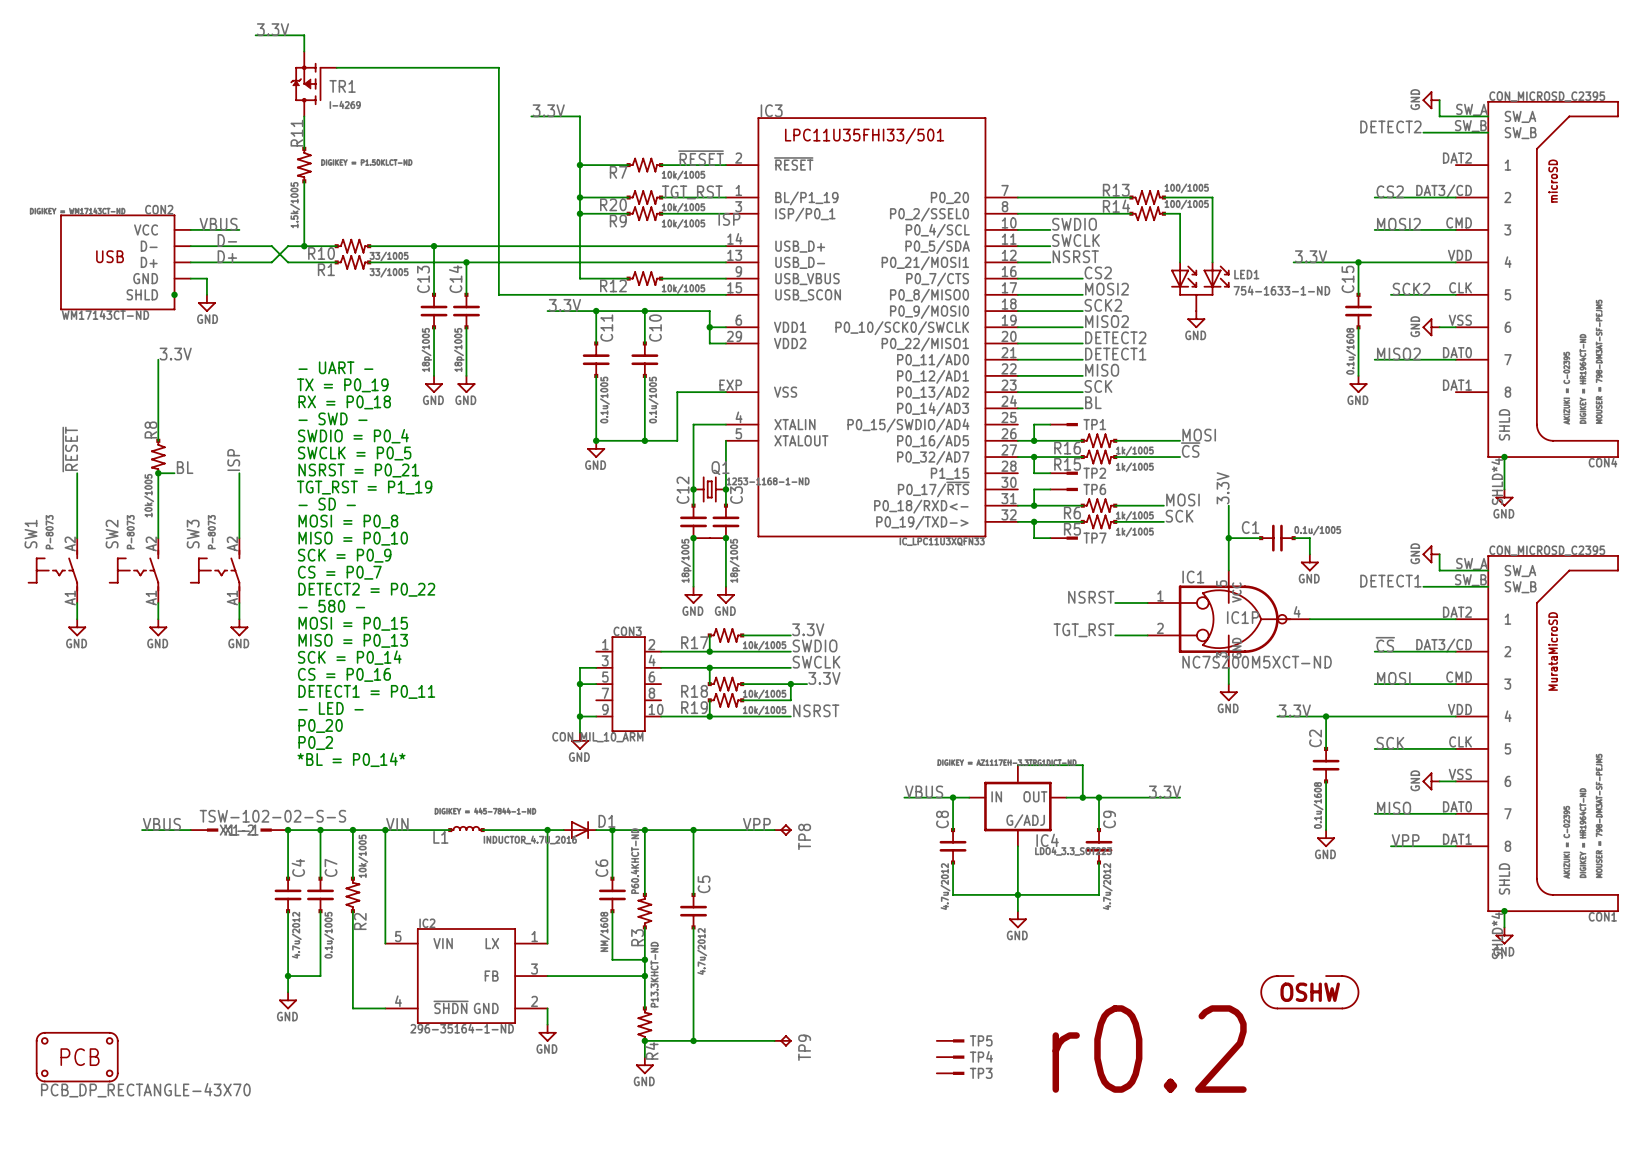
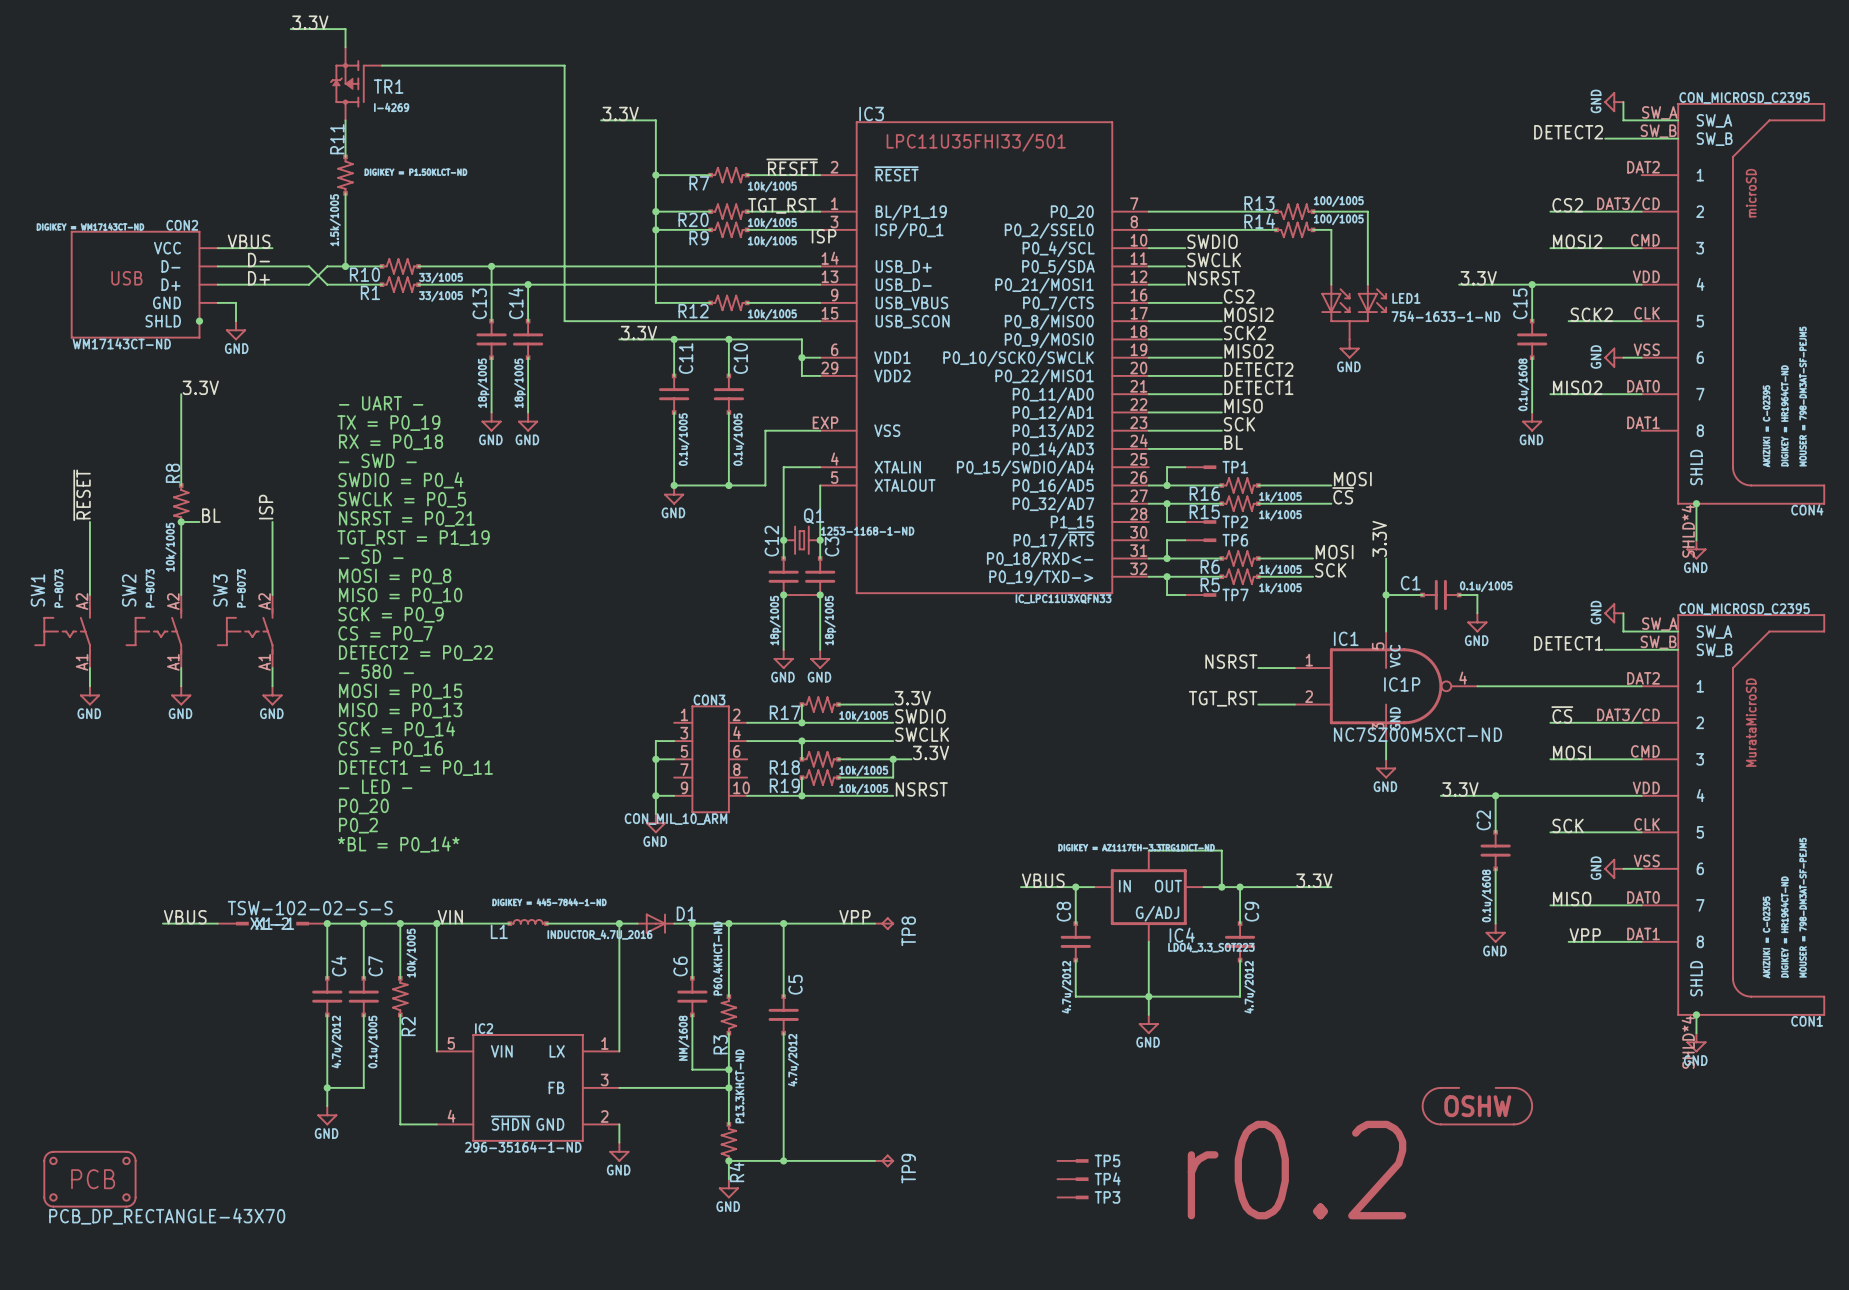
drawing: [1196, 596, 1210, 610] -> none
line: (1180, 602) (1196, 602) -> none
line: (1261, 619) (1290, 619) -> none
line: (1261, 619) (1251, 604) (1237, 594) (1220, 590) (1202, 593) (1210, 605) (1213, 619) (1210, 633) (1202, 645) (1220, 648) (1237, 644) (1251, 634) (1261, 619) -> none
drawing: [1196, 629, 1210, 642] -> none
line: (1180, 635) (1196, 635) -> none

